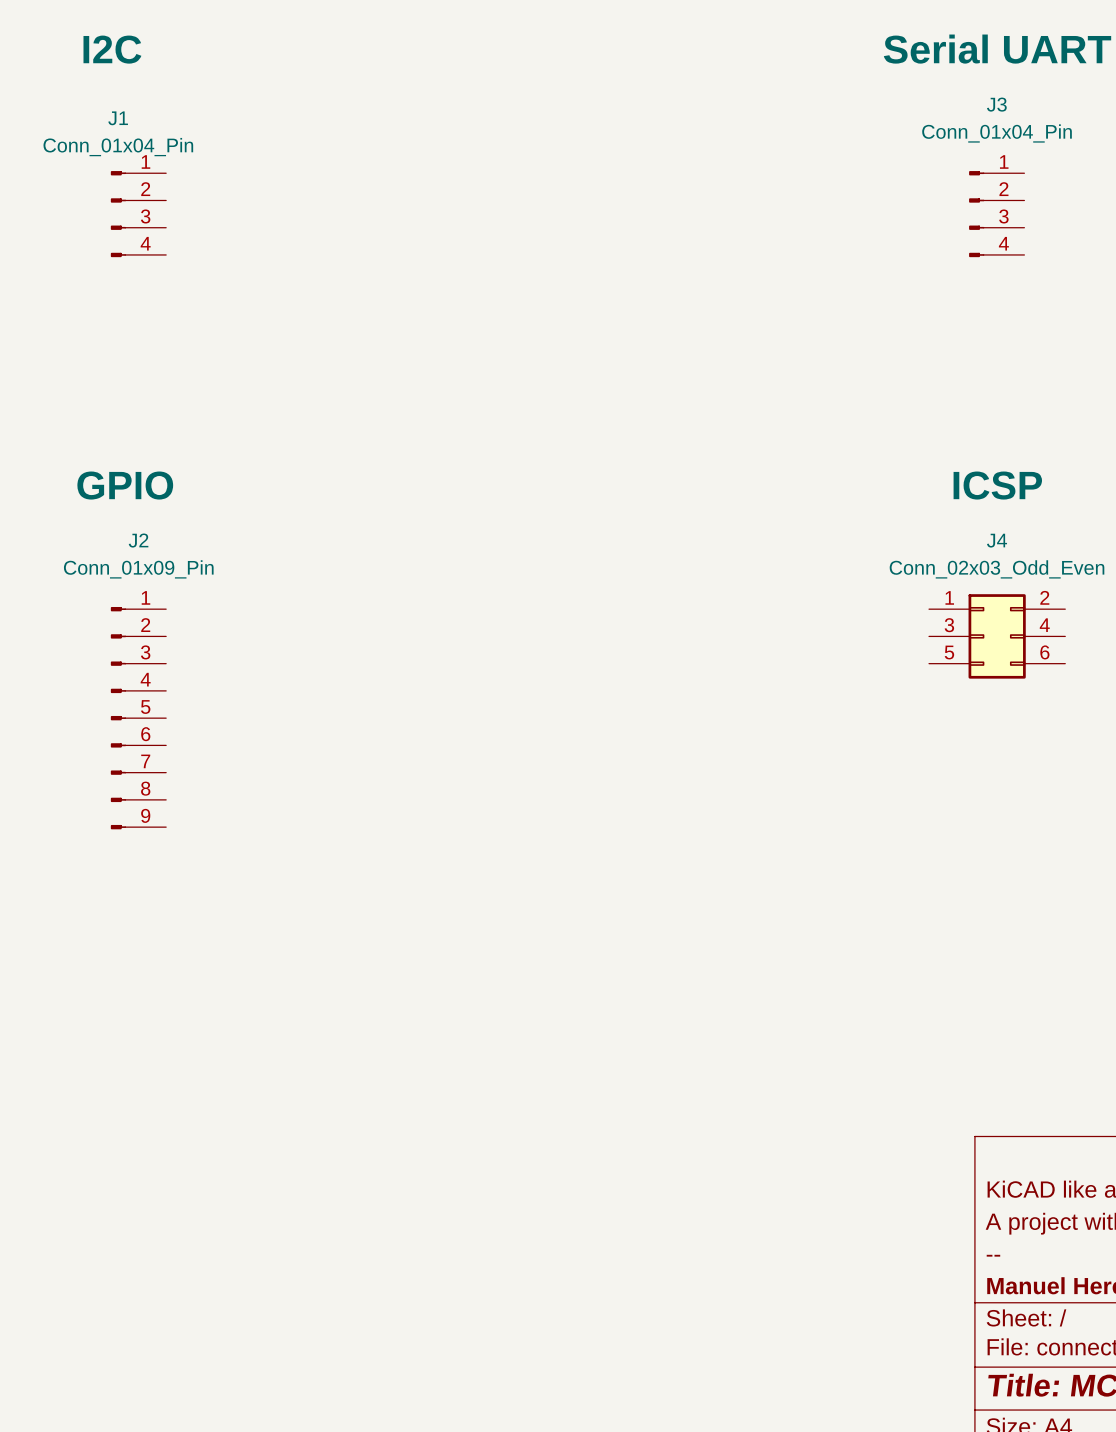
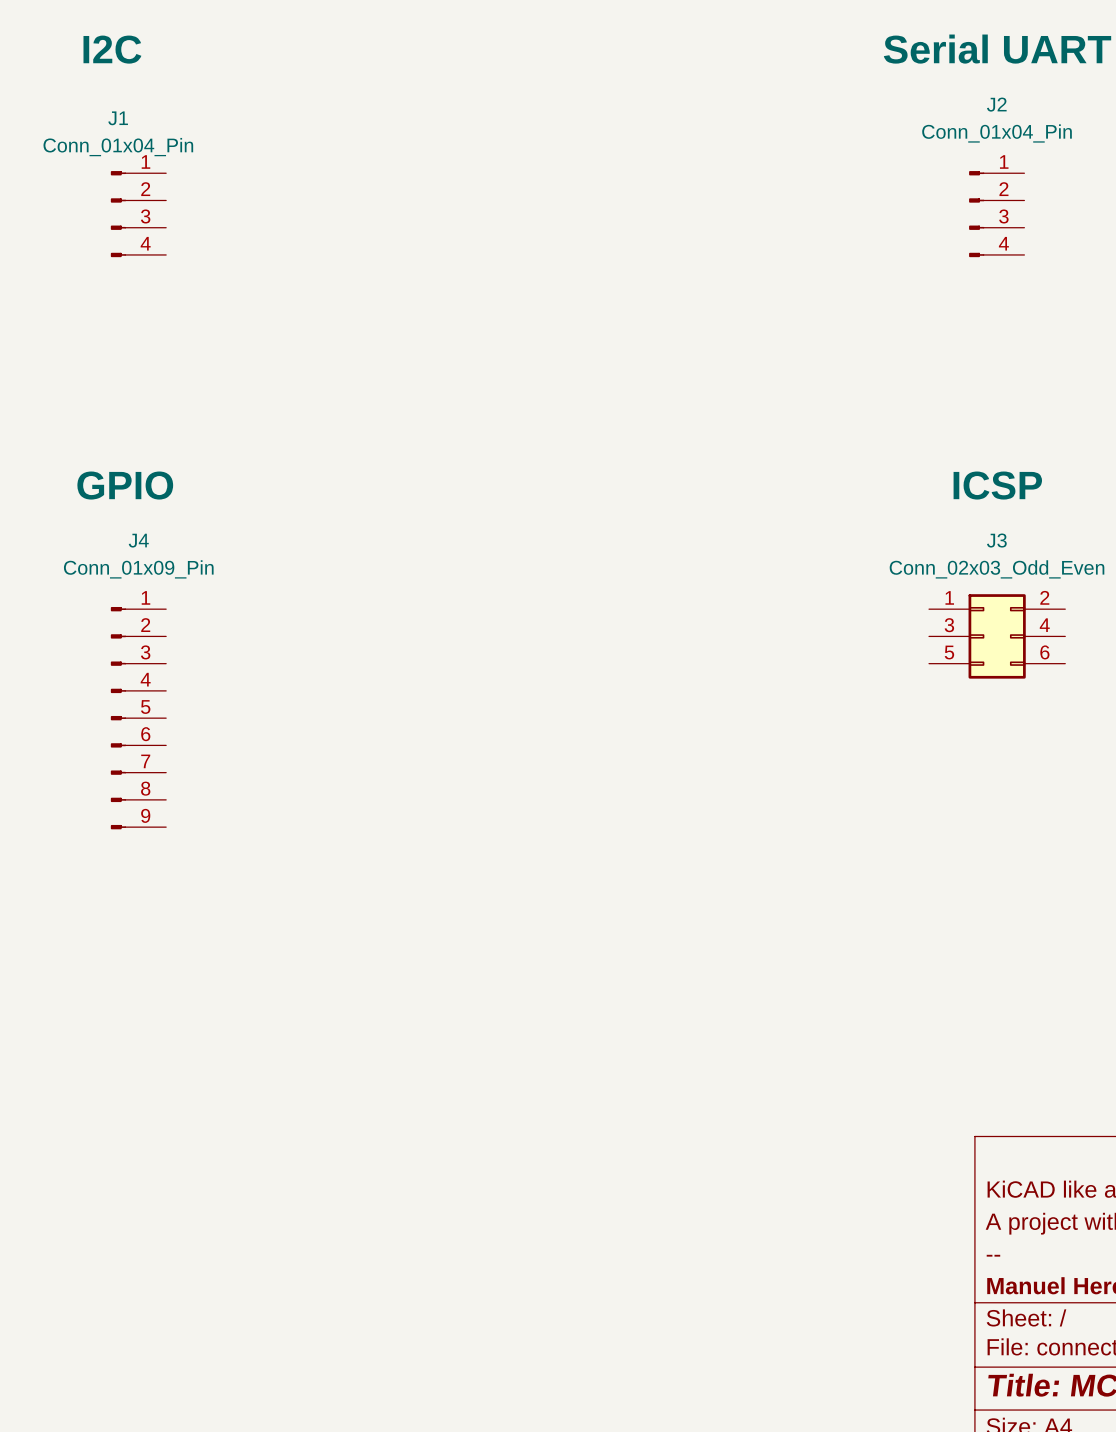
J3 name: J3 (996, 104) -> J2 (996, 104)
J2 name: J2 (138, 540) -> J4 (138, 540)
J4 name: J4 (997, 540) -> J3 (996, 540)

